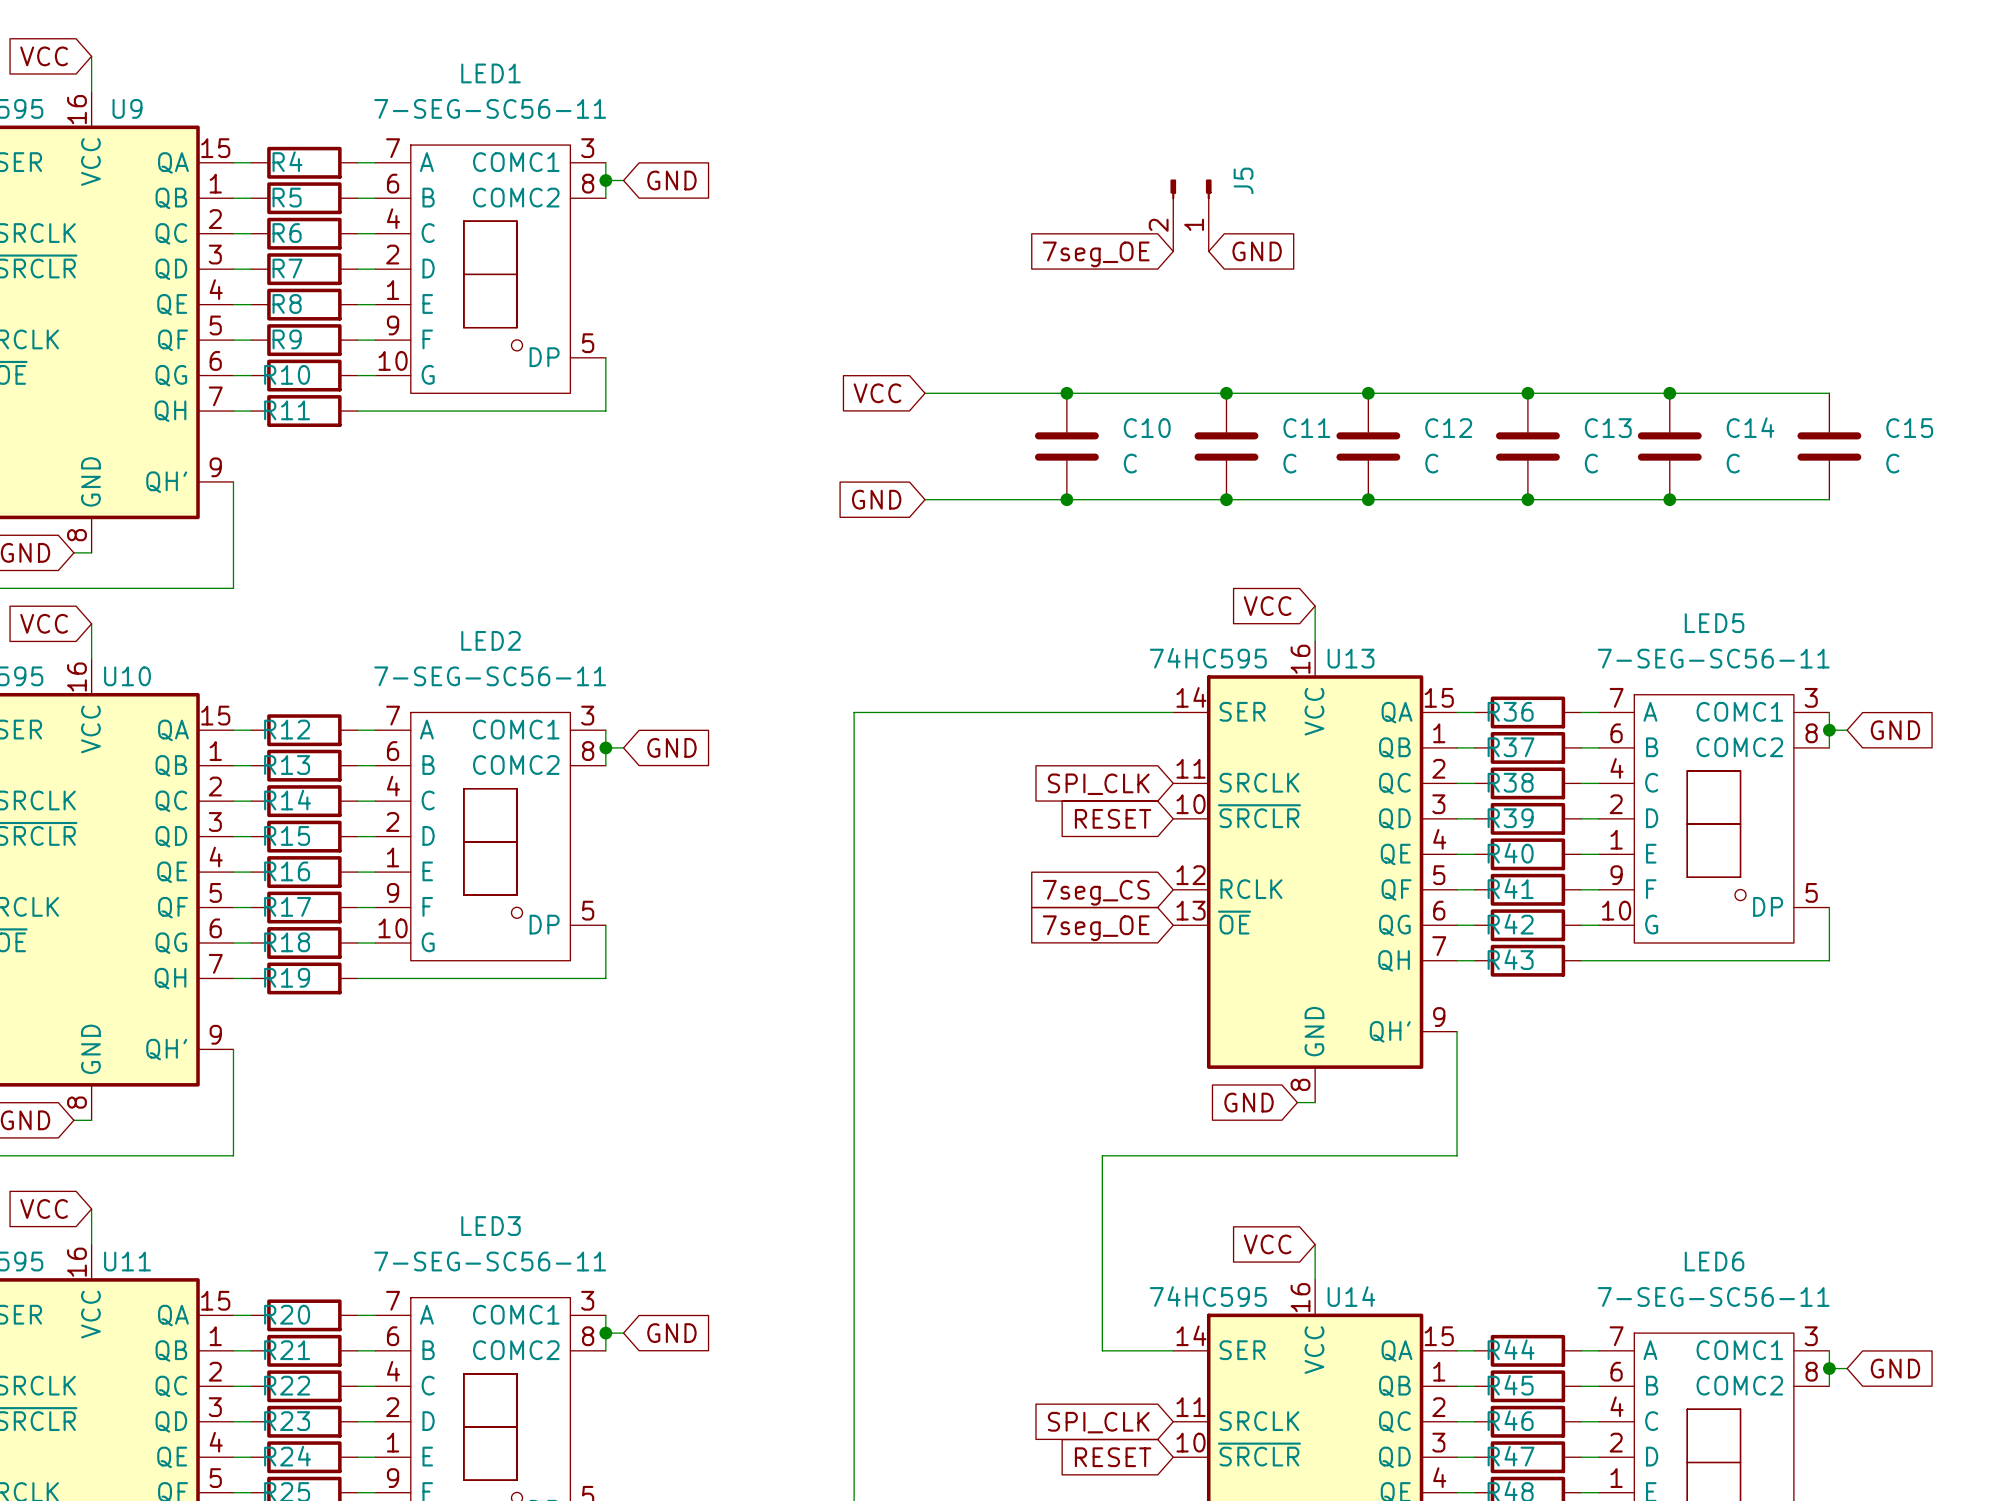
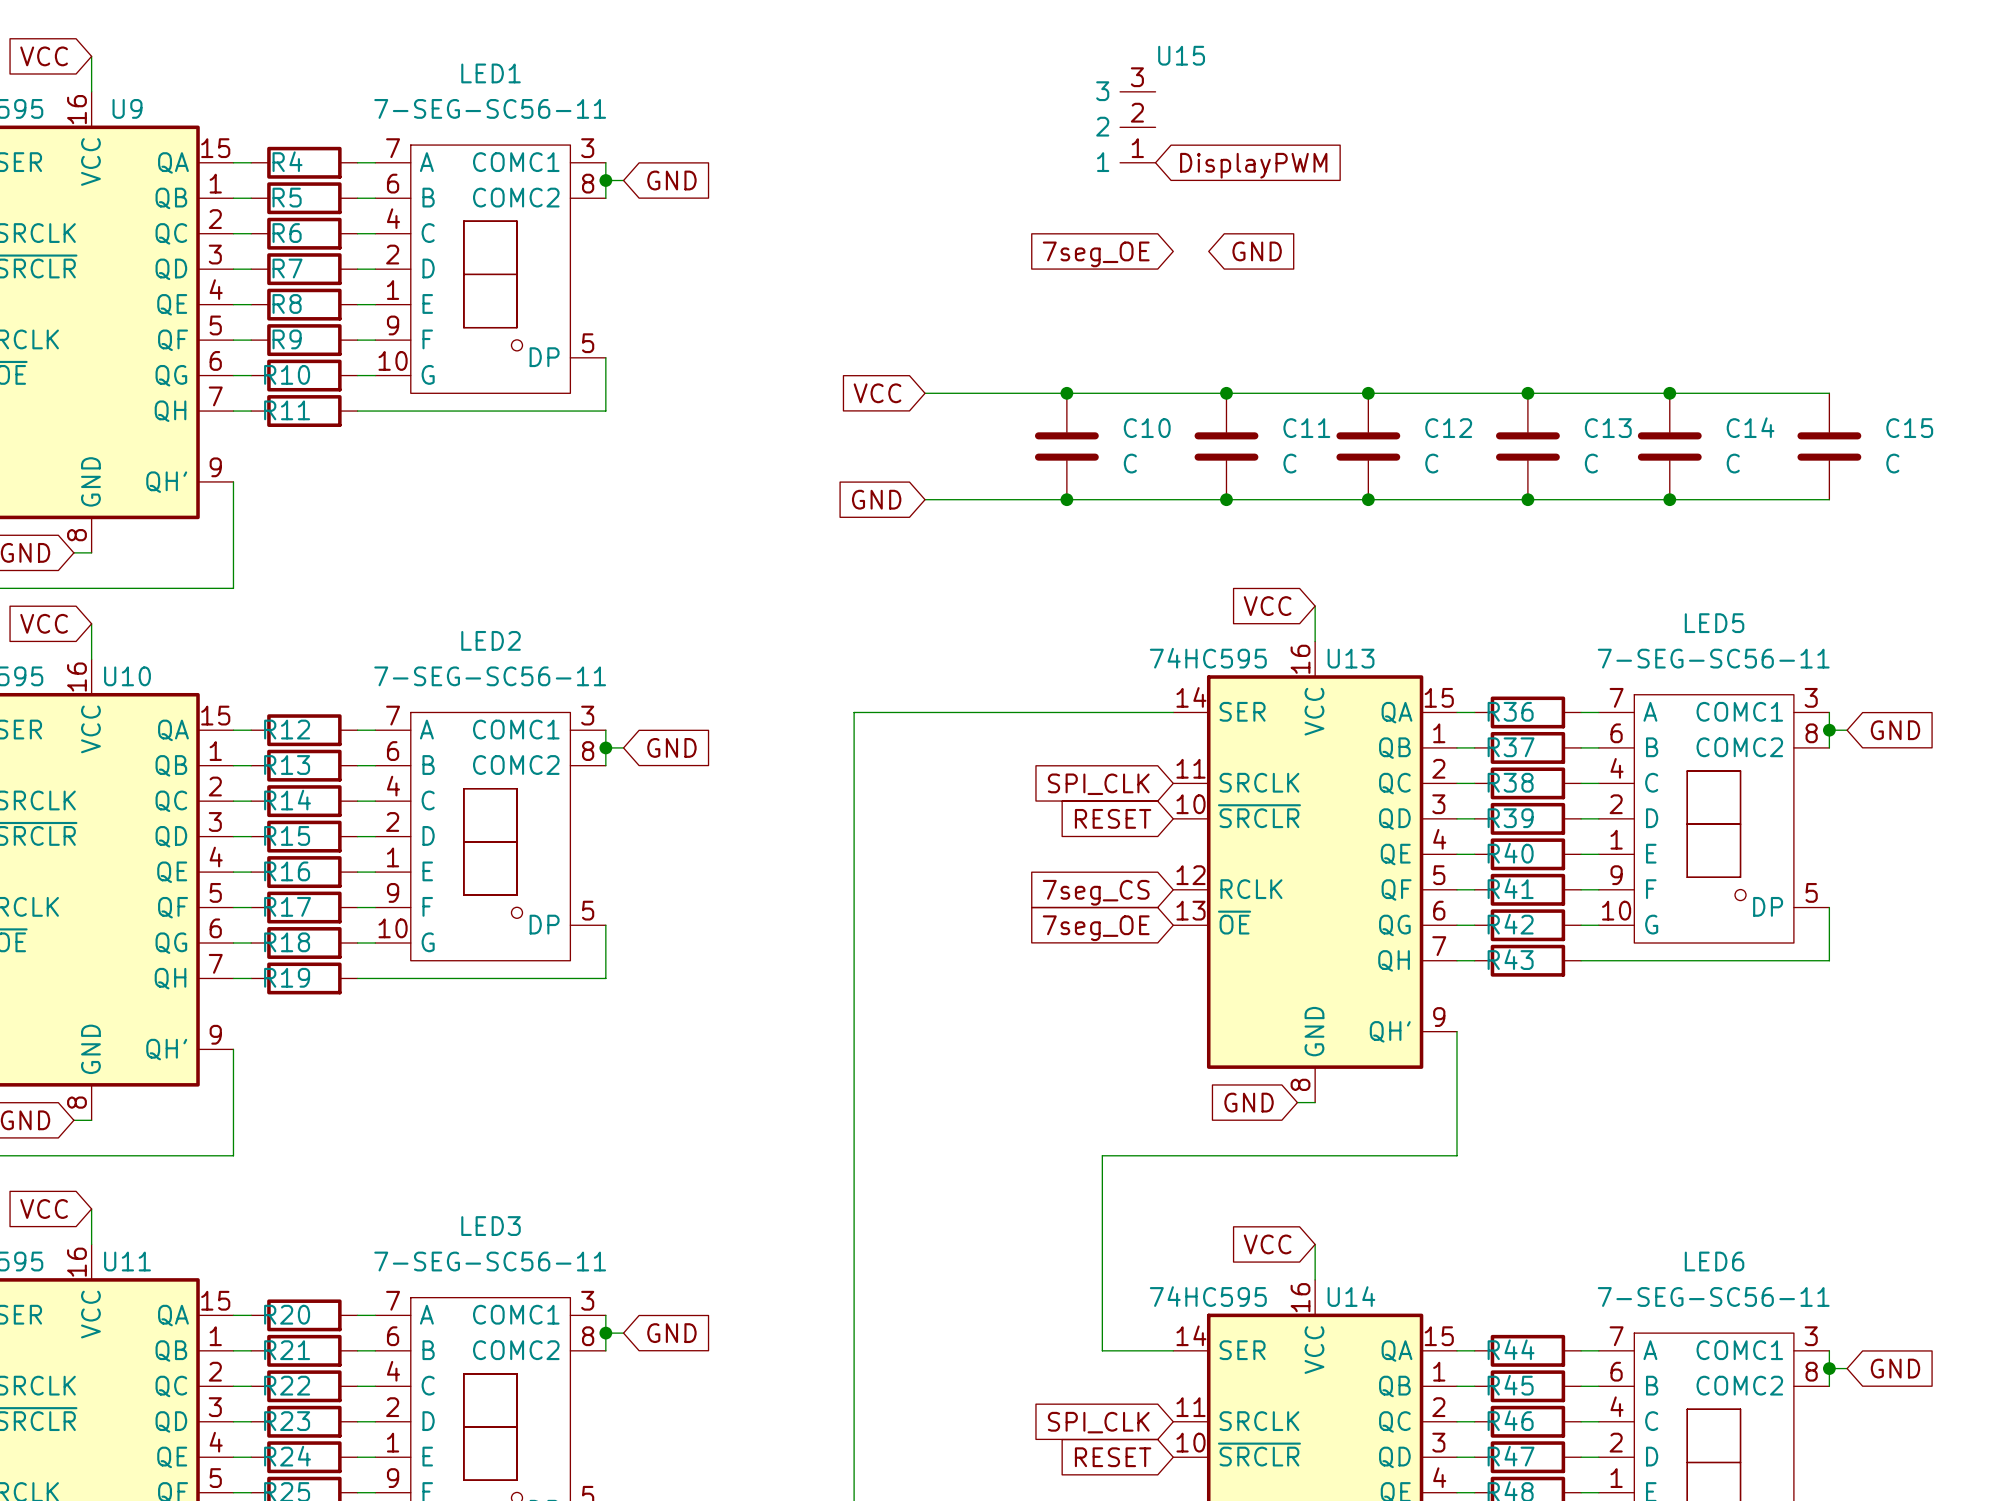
U15: none -> (1137, 127)
global label: none -> DisplayPWM (1253, 165)
J5: (1191, 215) -> none

